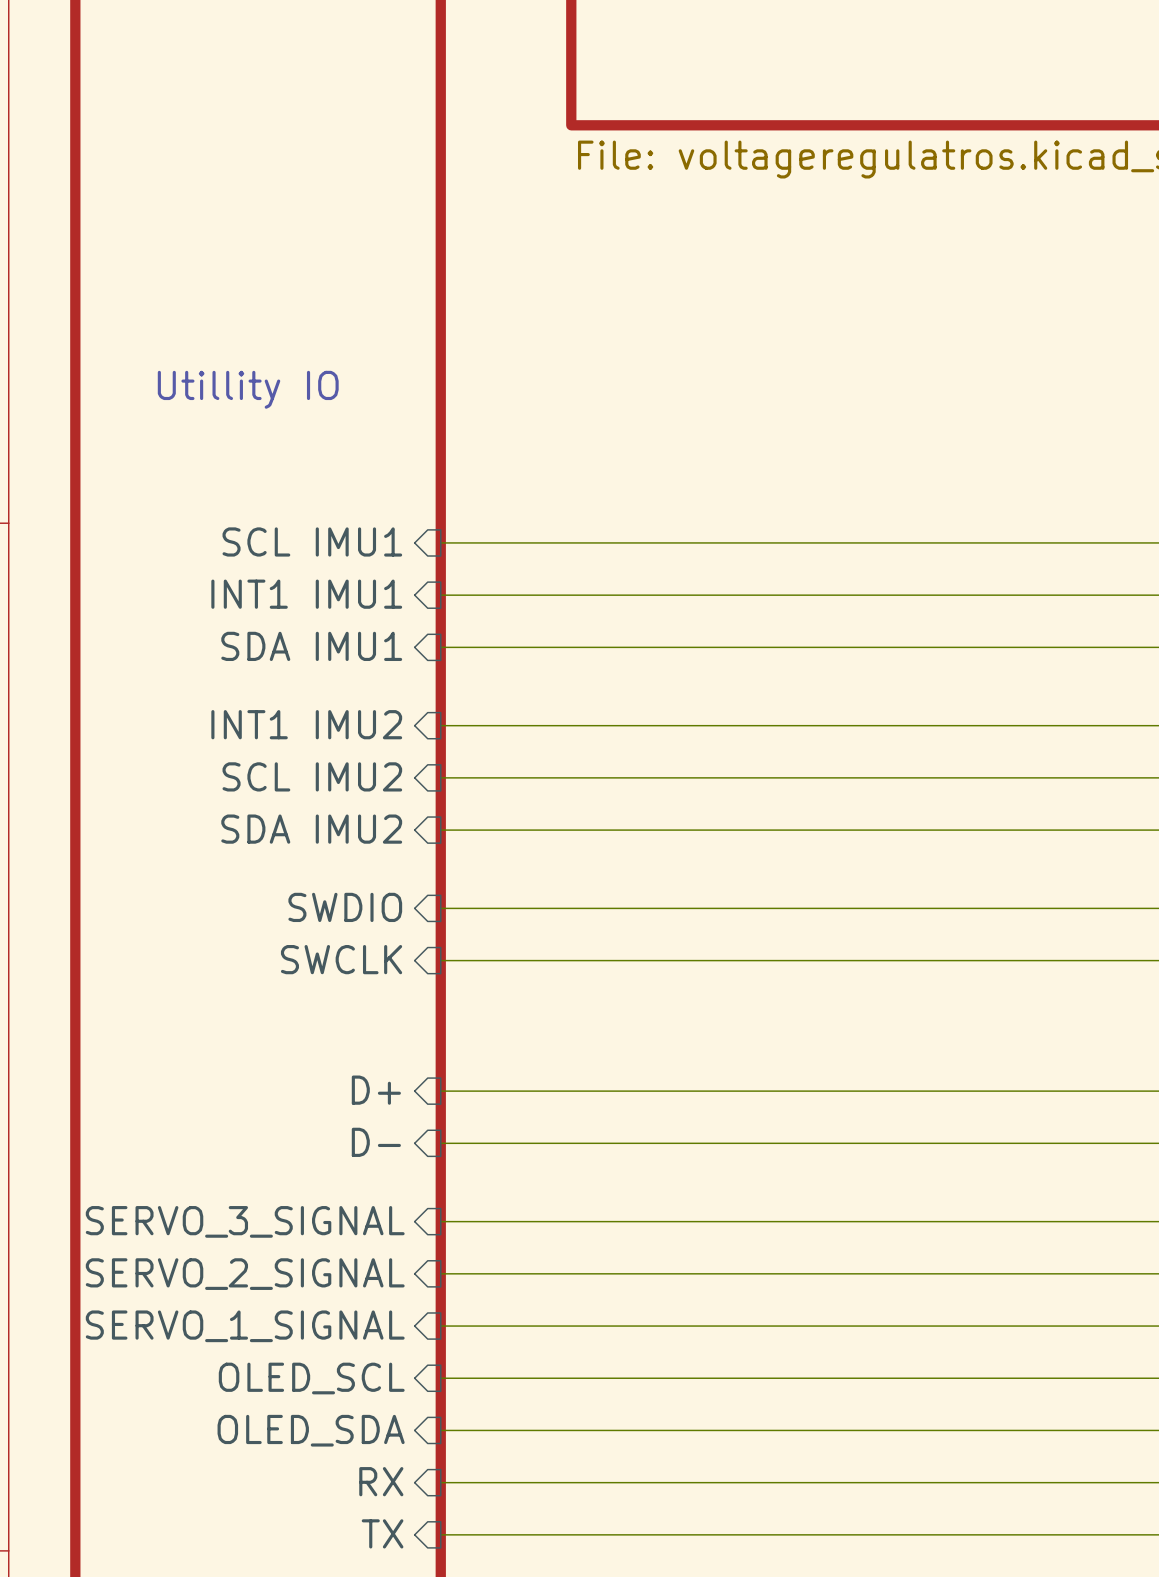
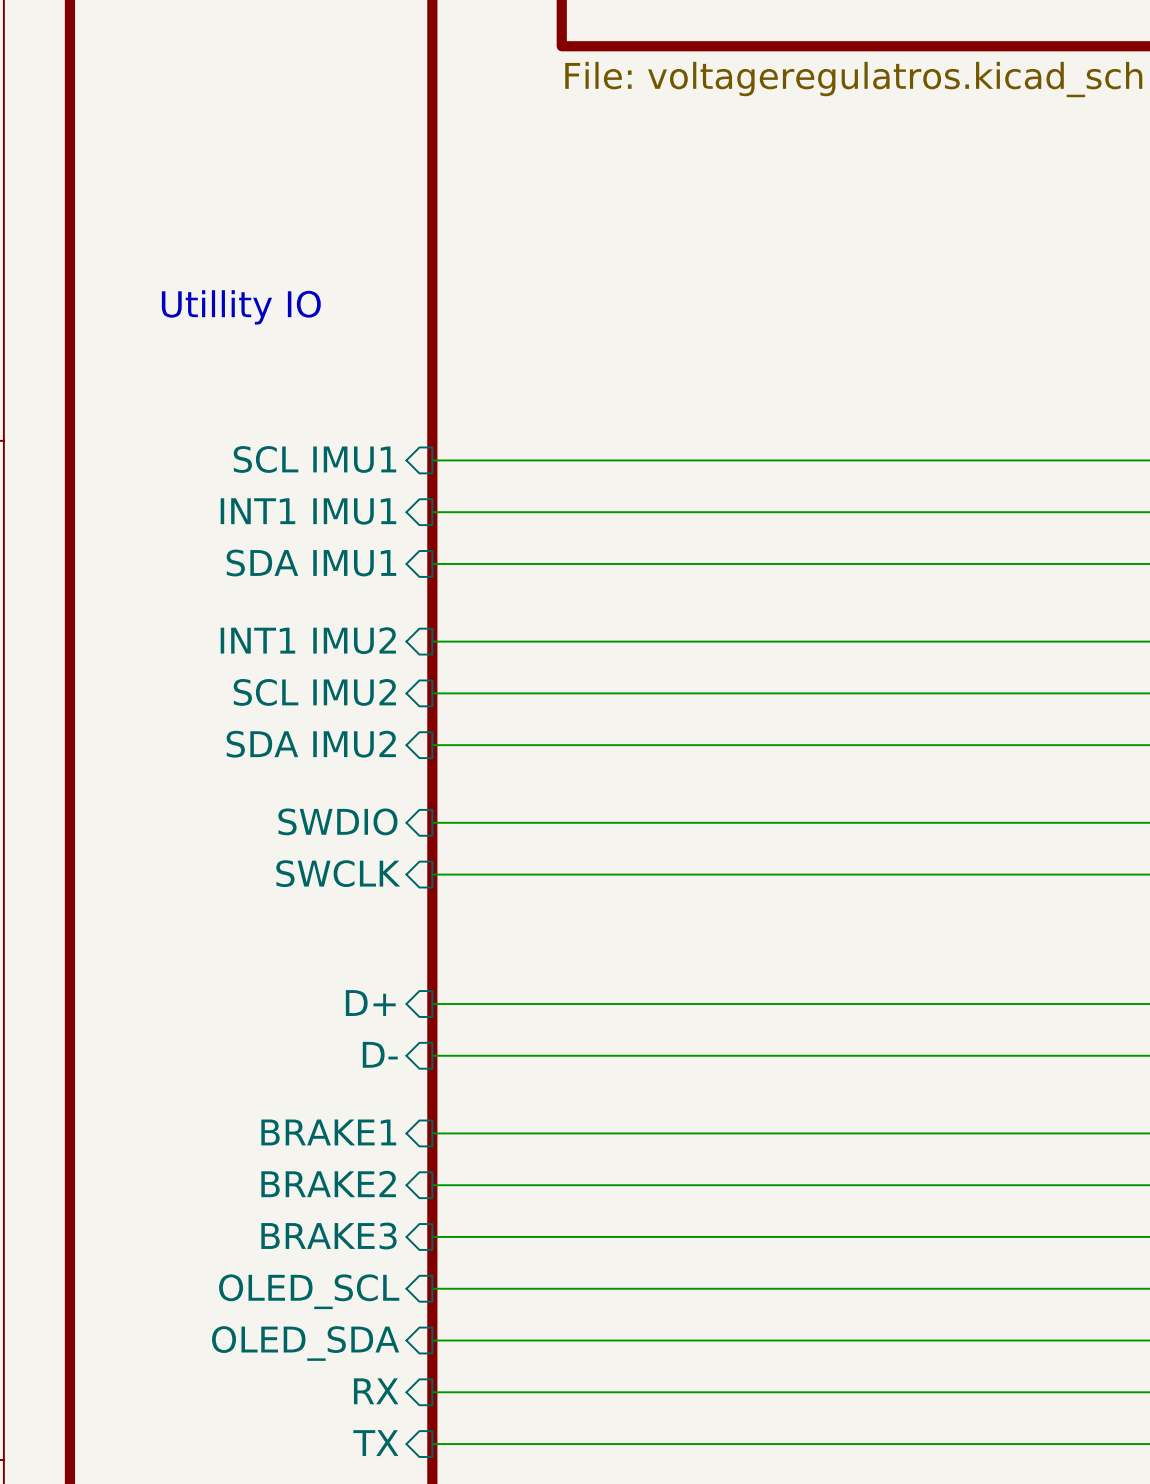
sheet pin: SERVO_3_SIGNAL (245, 1221) -> BRAKE1 (328, 1132)
sheet pin: SERVO_2_SIGNAL (245, 1274) -> BRAKE2 (328, 1184)
sheet pin: SERVO_1_SIGNAL (245, 1326) -> BRAKE3 (328, 1236)

